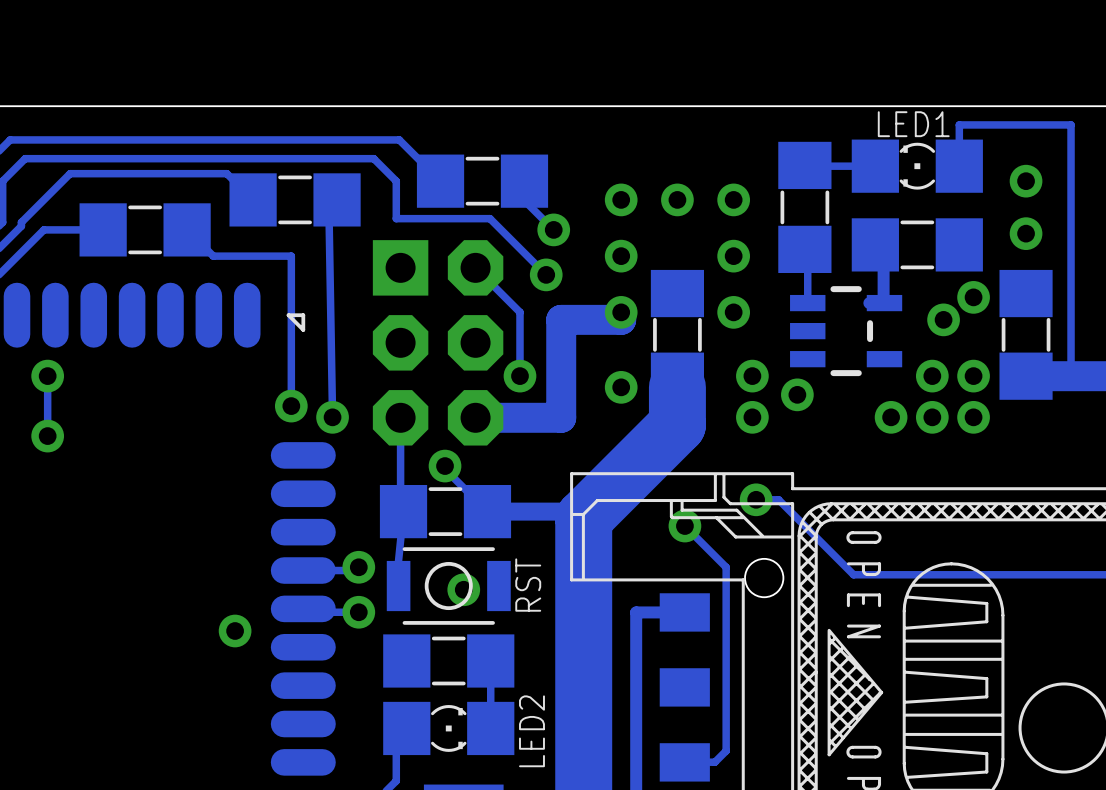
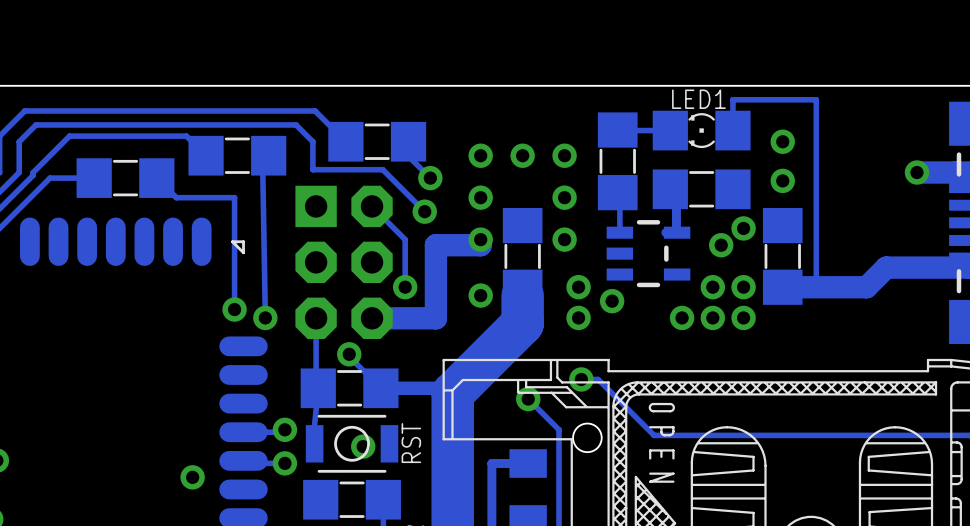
track: (47, 376) (47, 436) -> none
via: (47, 376) -> none
via: (47, 436) -> none

